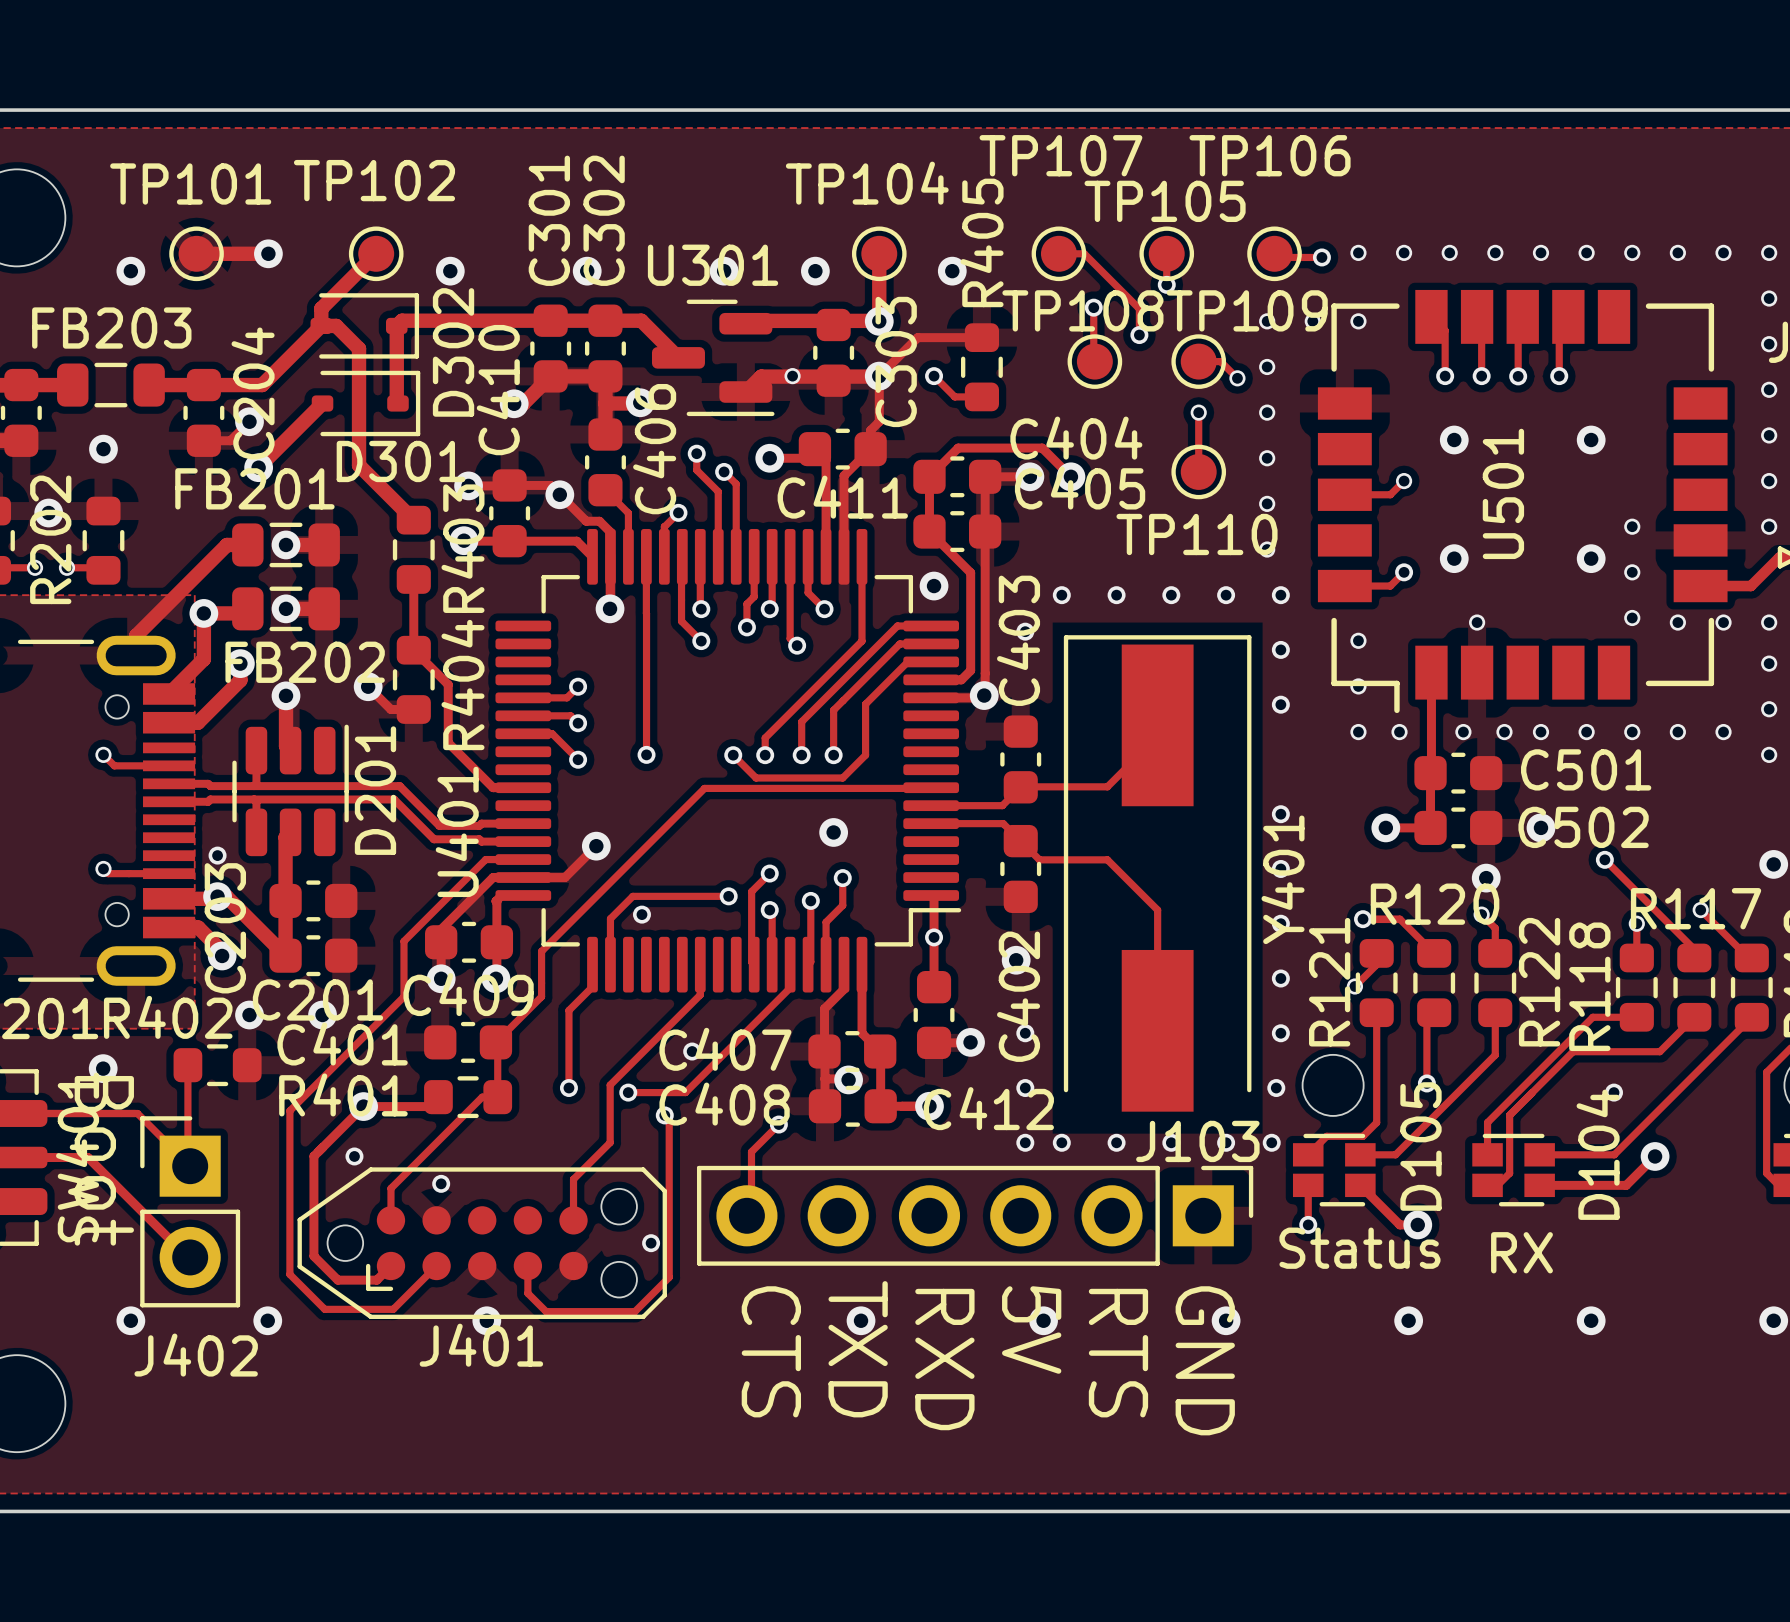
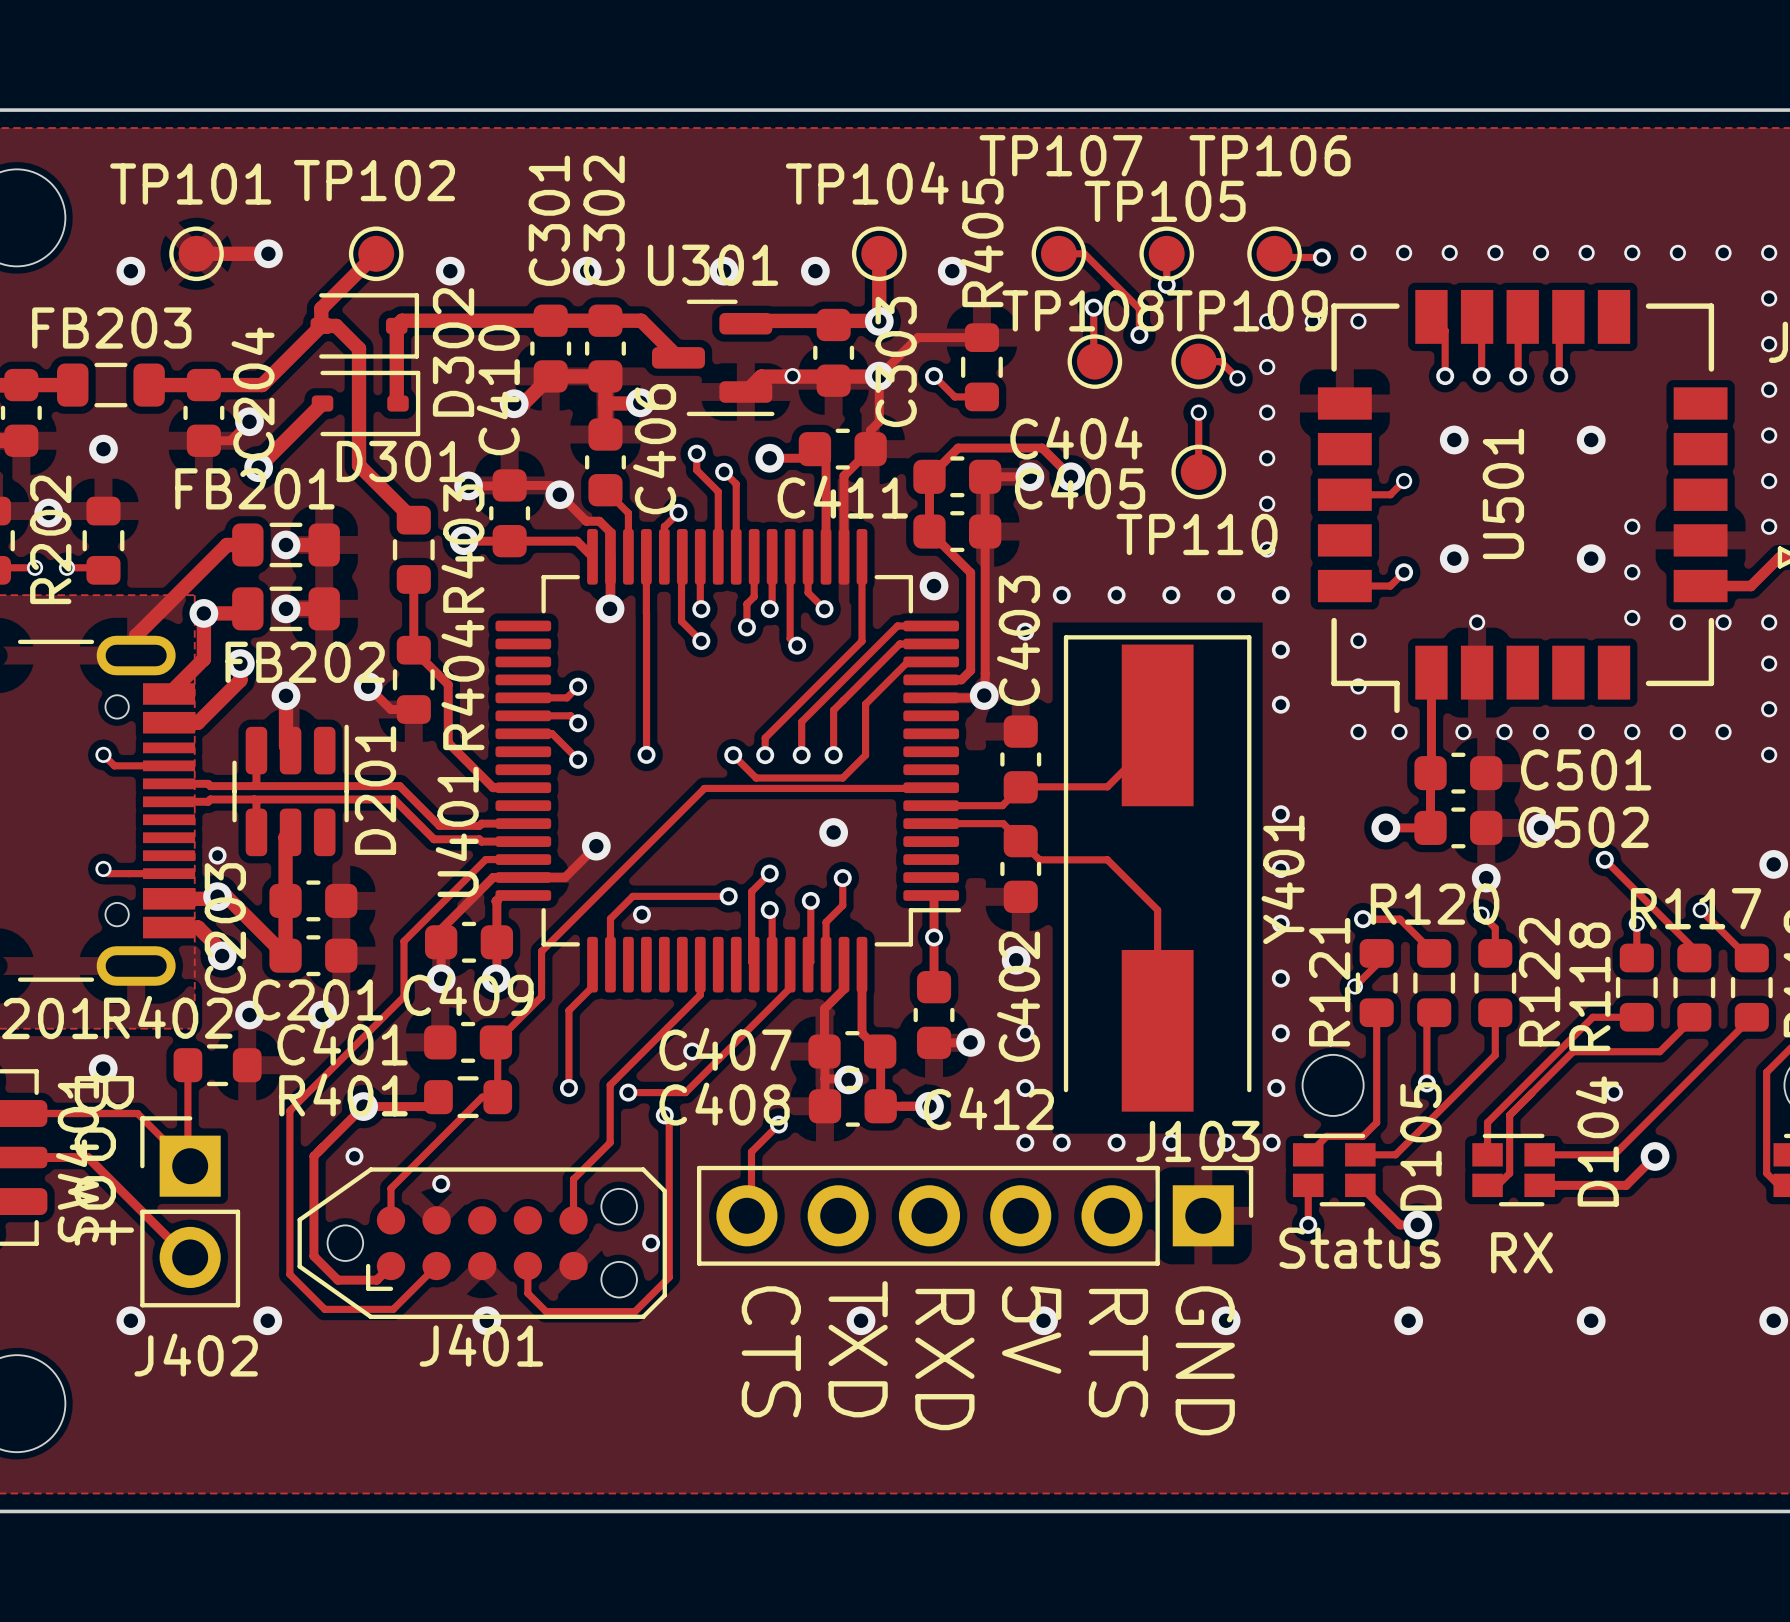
D104 name position: D104 (1598, 1154) -> D104 (1597, 1141)

